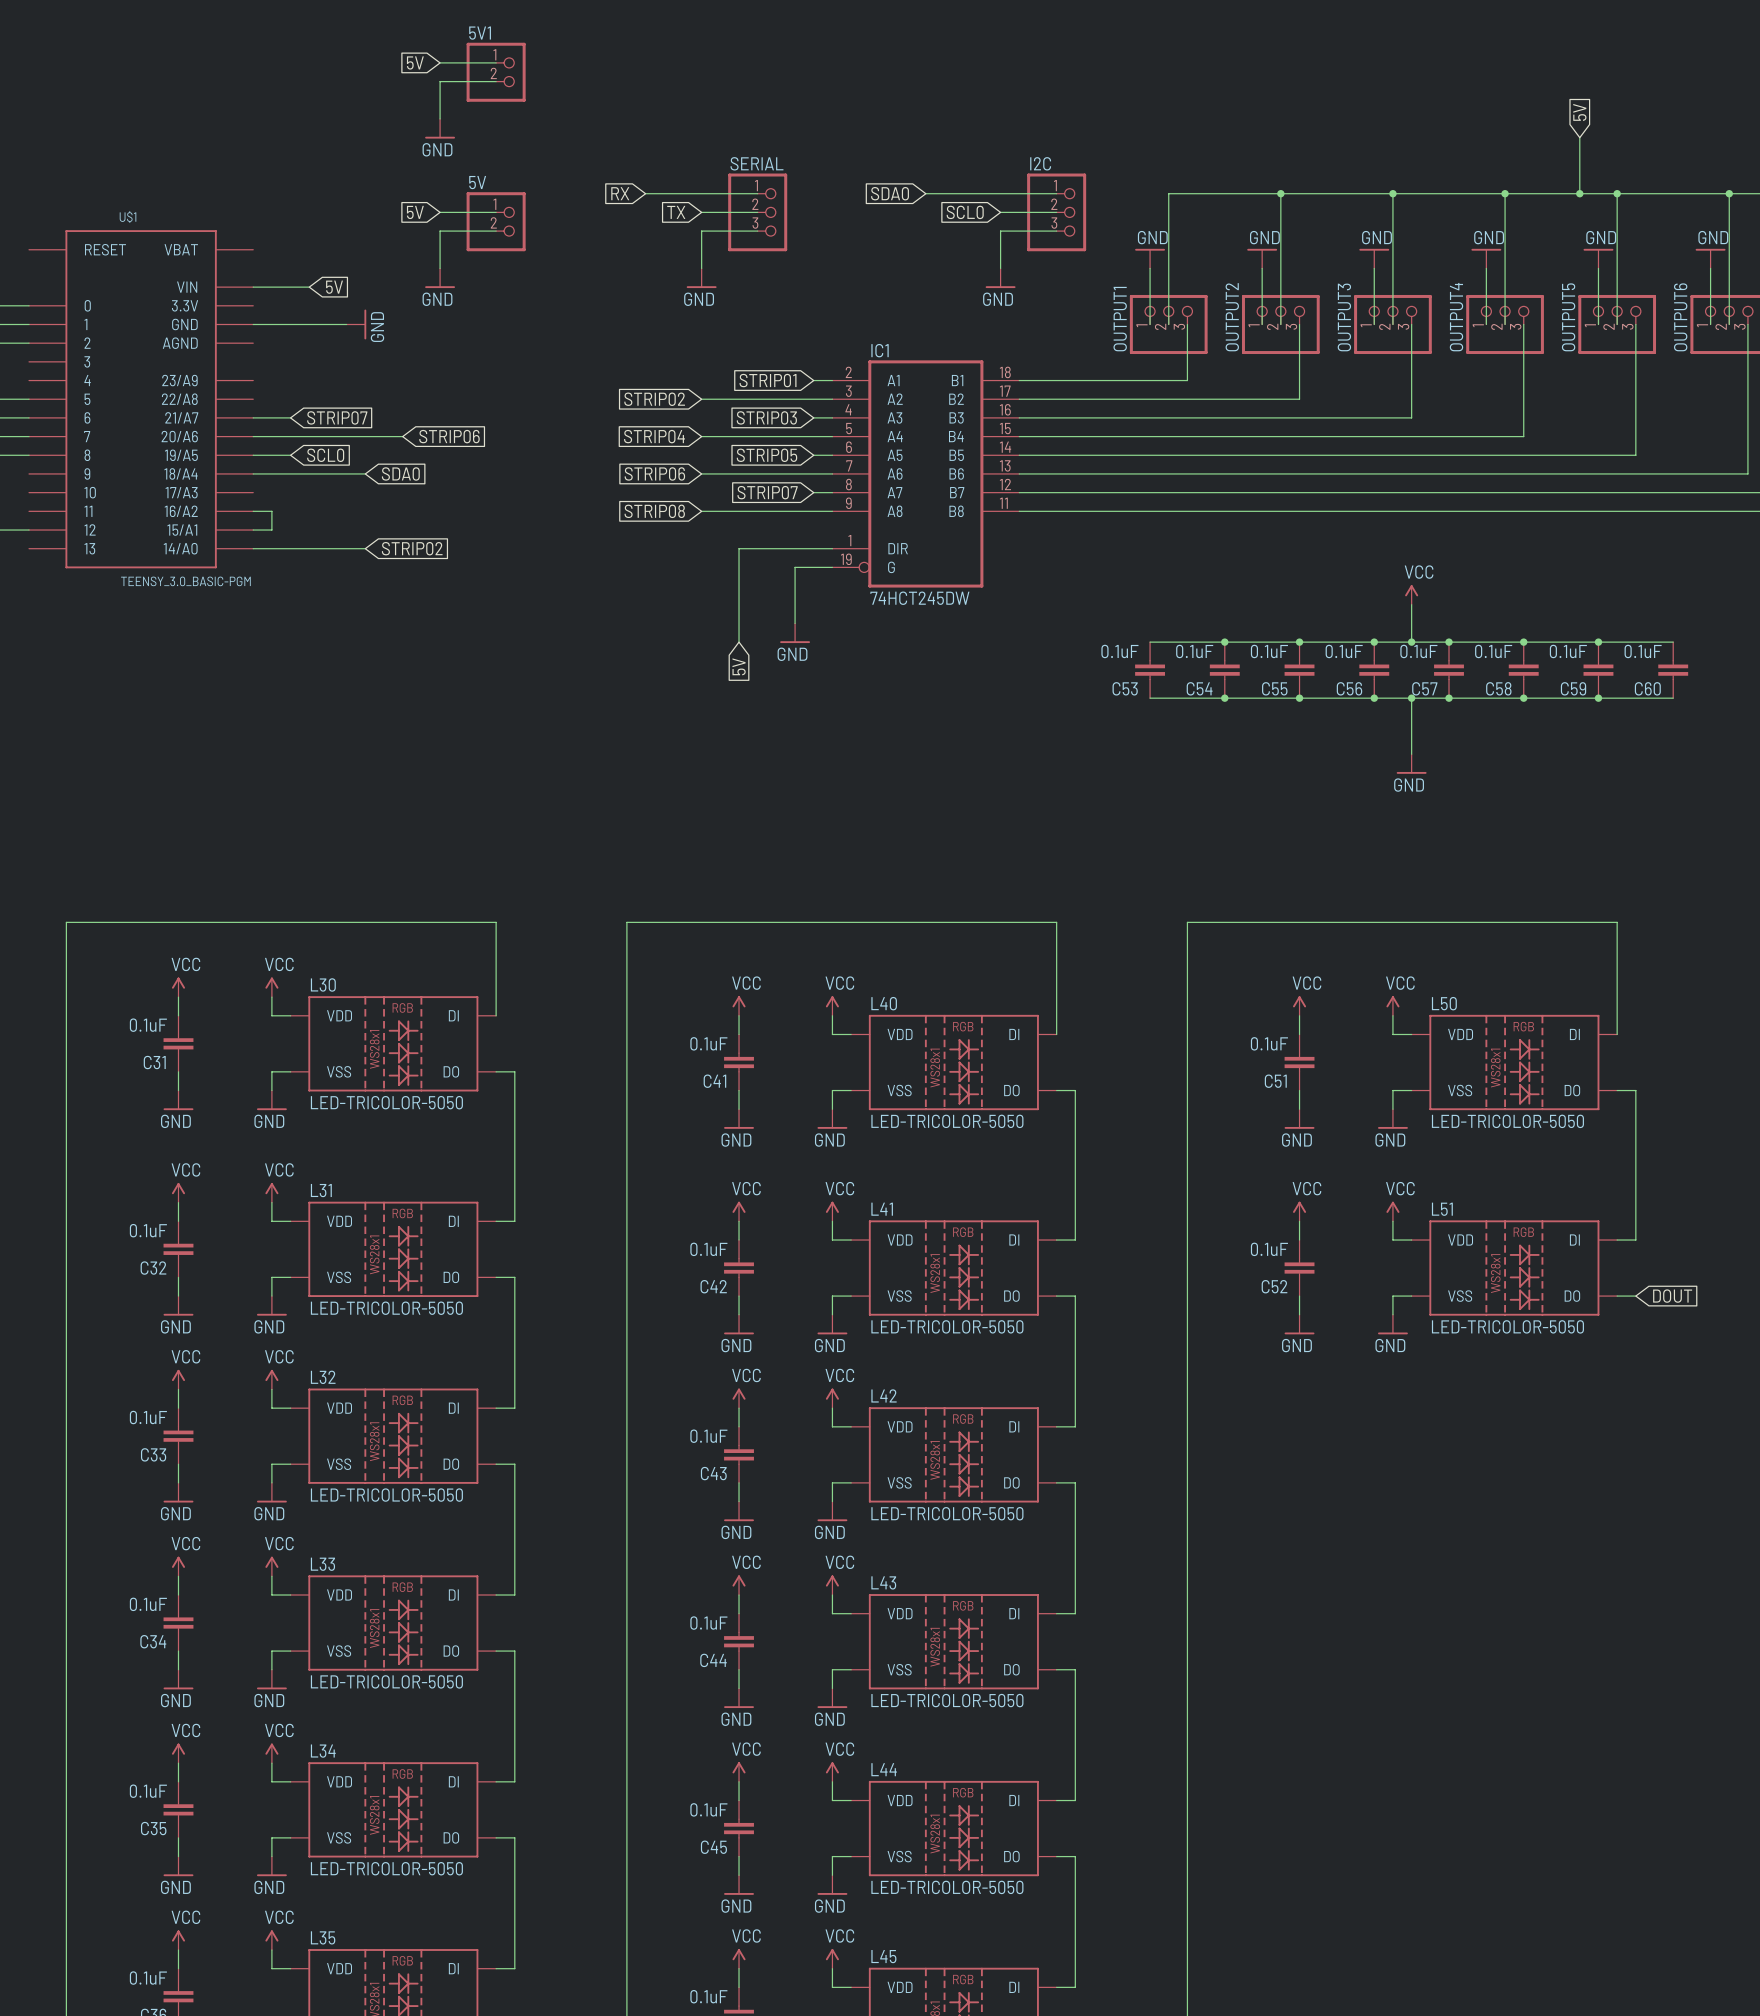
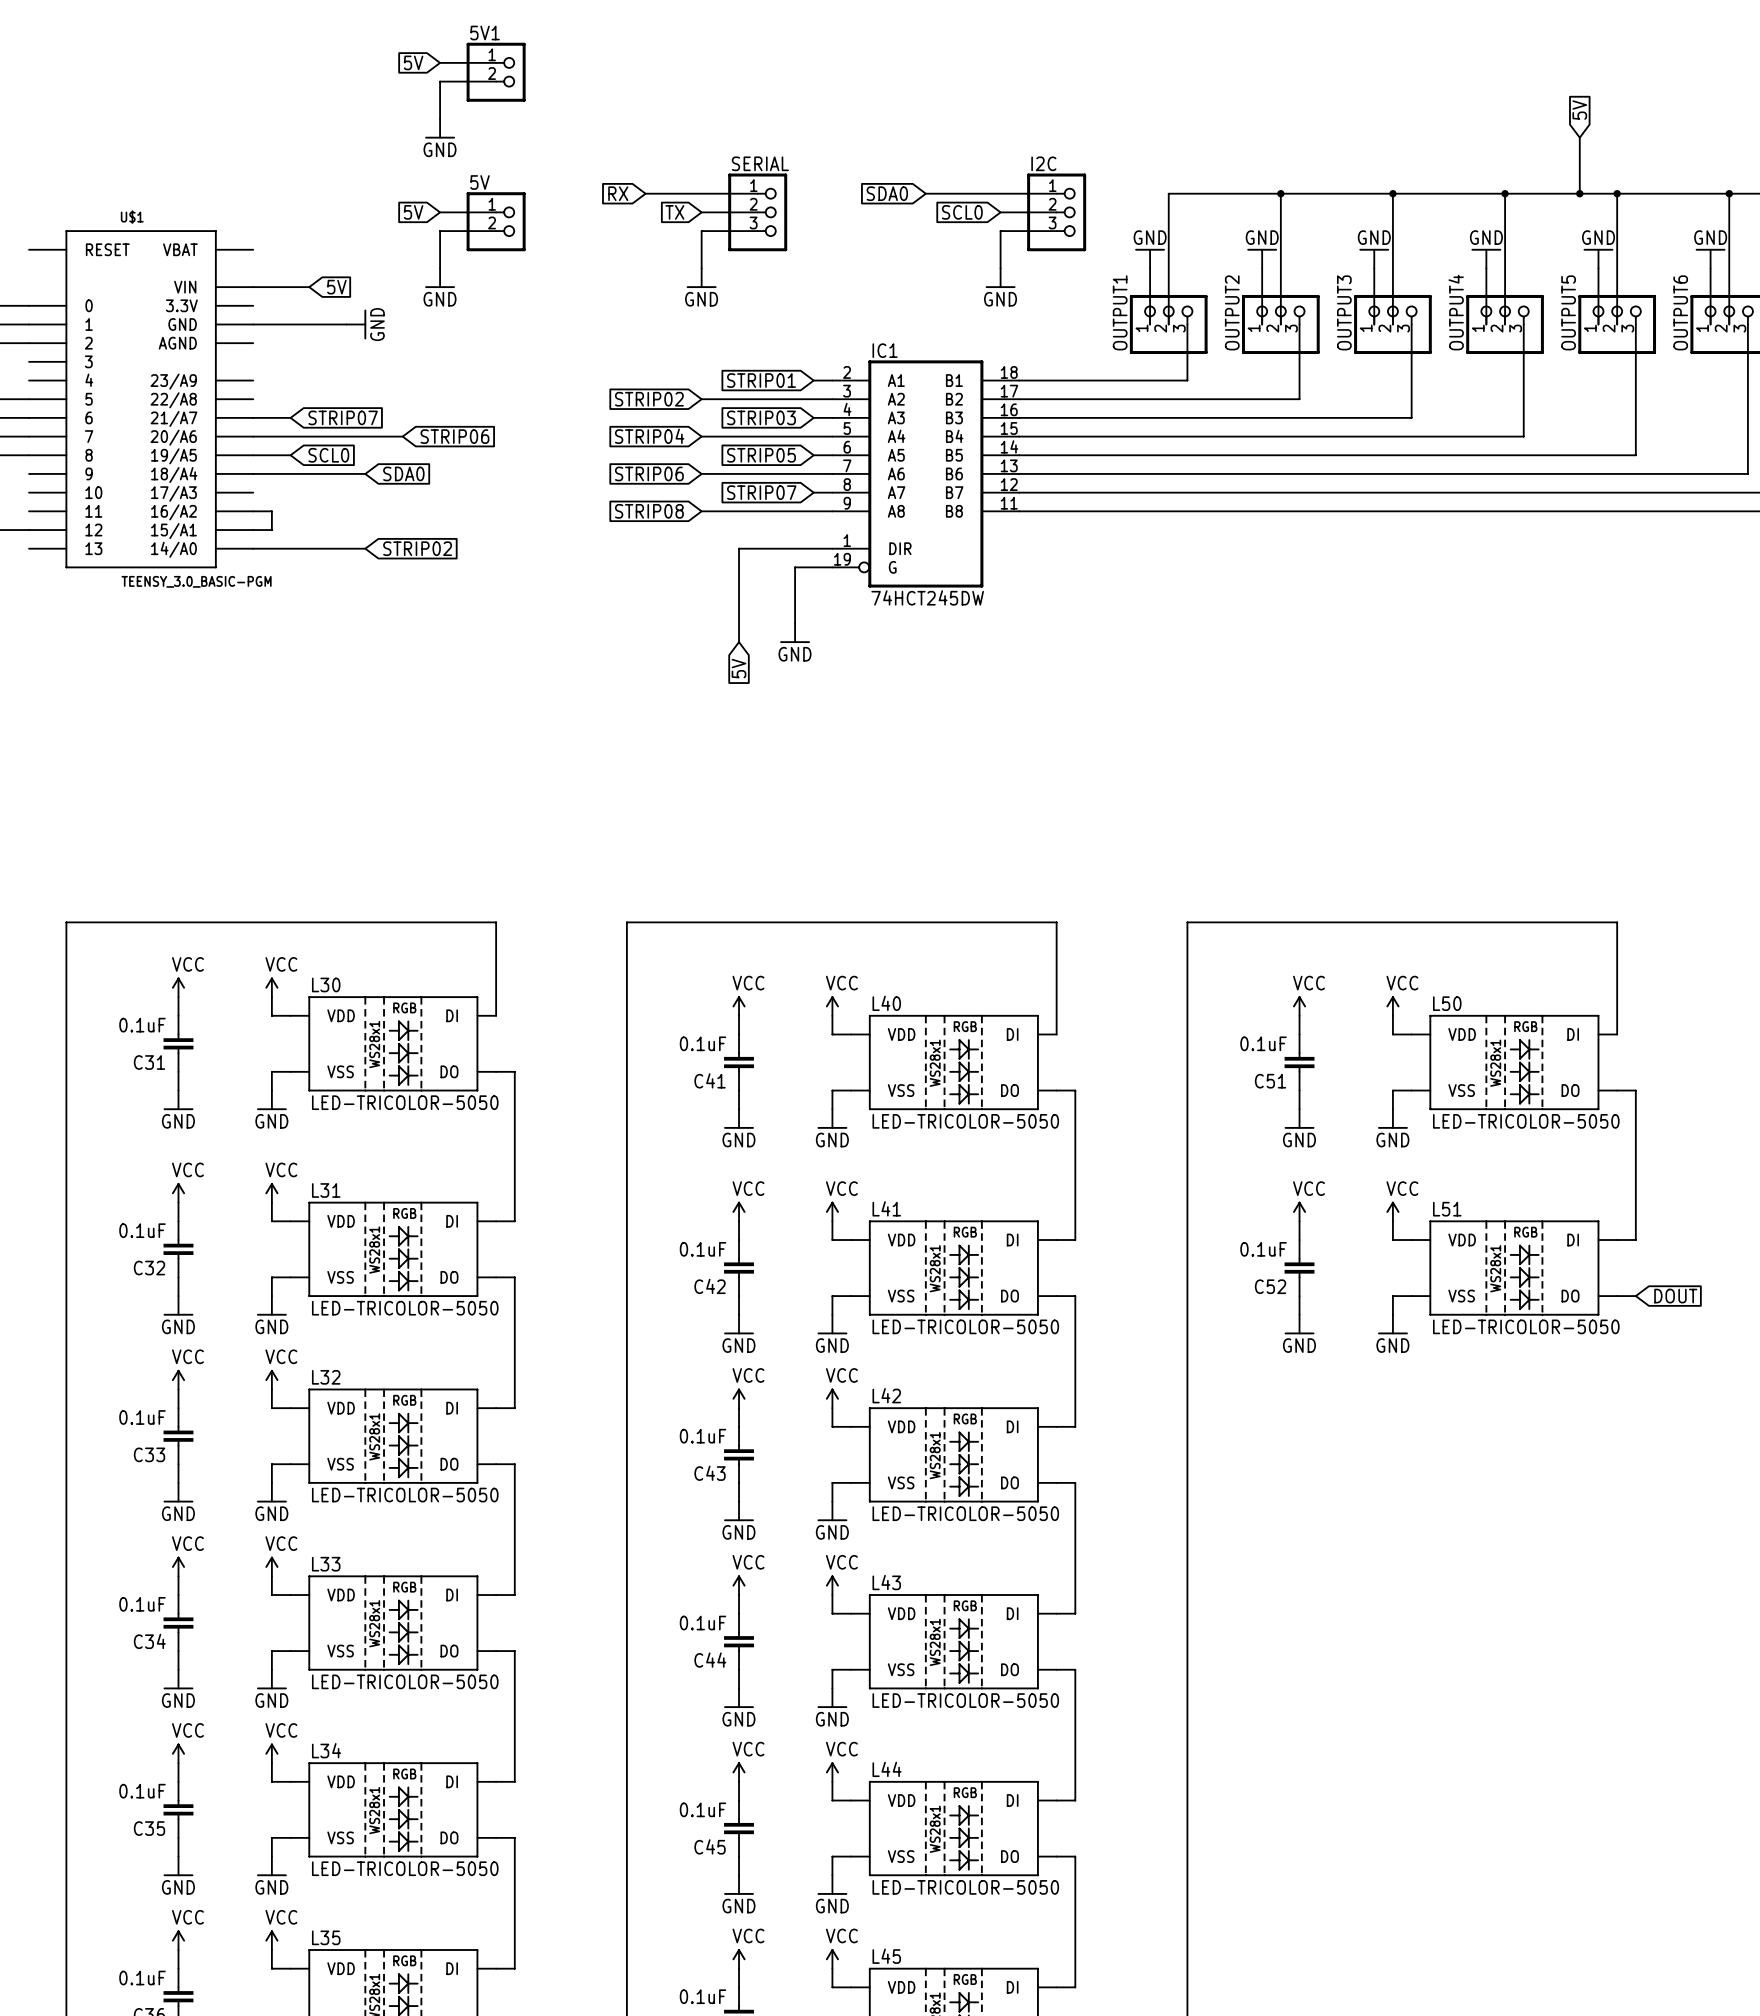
power symbol: VCC (1411, 594) -> none
wire: (1411, 604) (1411, 642) -> none
wire: (1150, 642) (1673, 642) -> none
junction: (1224, 642) -> none
junction: (1299, 642) -> none
junction: (1374, 642) -> none
junction: (1411, 642) -> none
junction: (1449, 642) -> none
junction: (1523, 642) -> none
junction: (1598, 642) -> none
C53: 0.1uF (1150, 670) -> none
C54: 0.1uF (1224, 670) -> none
C55: 0.1uF (1299, 670) -> none
C56: 0.1uF (1374, 670) -> none
C57: 0.1uF (1449, 670) -> none
C58: 0.1uF (1523, 670) -> none
C59: 0.1uF (1598, 670) -> none
C60: 0.1uF (1673, 670) -> none
wire: (1150, 698) (1673, 698) -> none
junction: (1224, 698) -> none
junction: (1299, 698) -> none
junction: (1374, 698) -> none
wire: (1411, 698) (1411, 754) -> none
junction: (1411, 698) -> none
junction: (1449, 698) -> none
junction: (1523, 698) -> none
junction: (1598, 698) -> none
power symbol: GND (1411, 764) -> none

